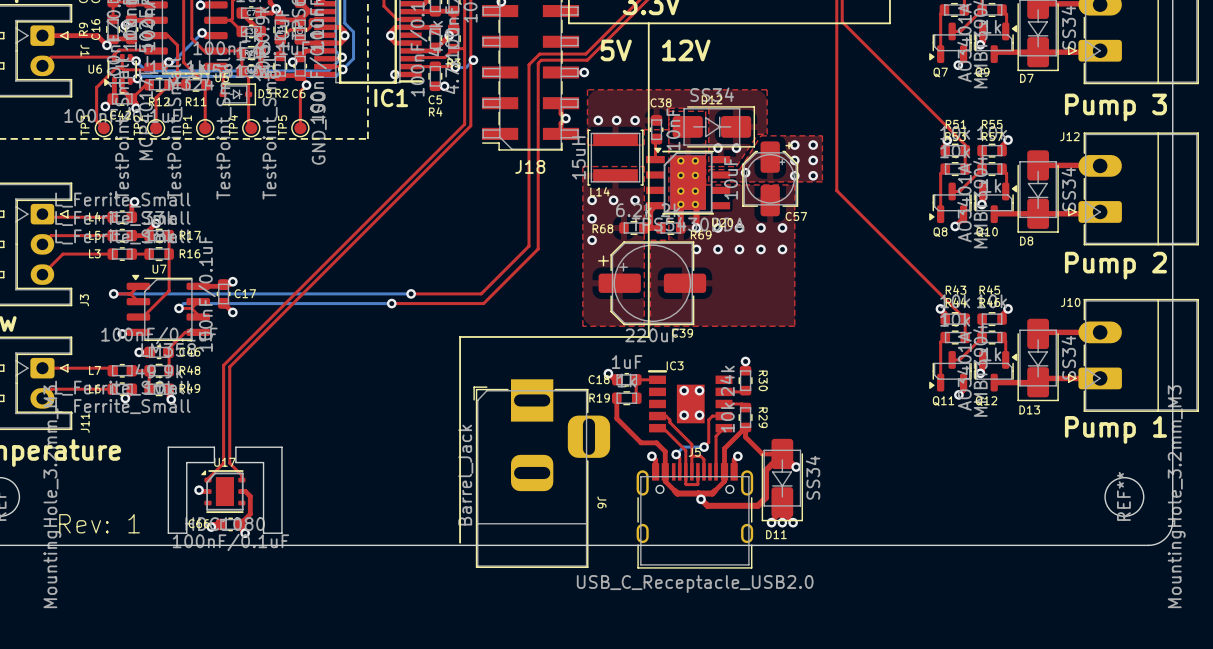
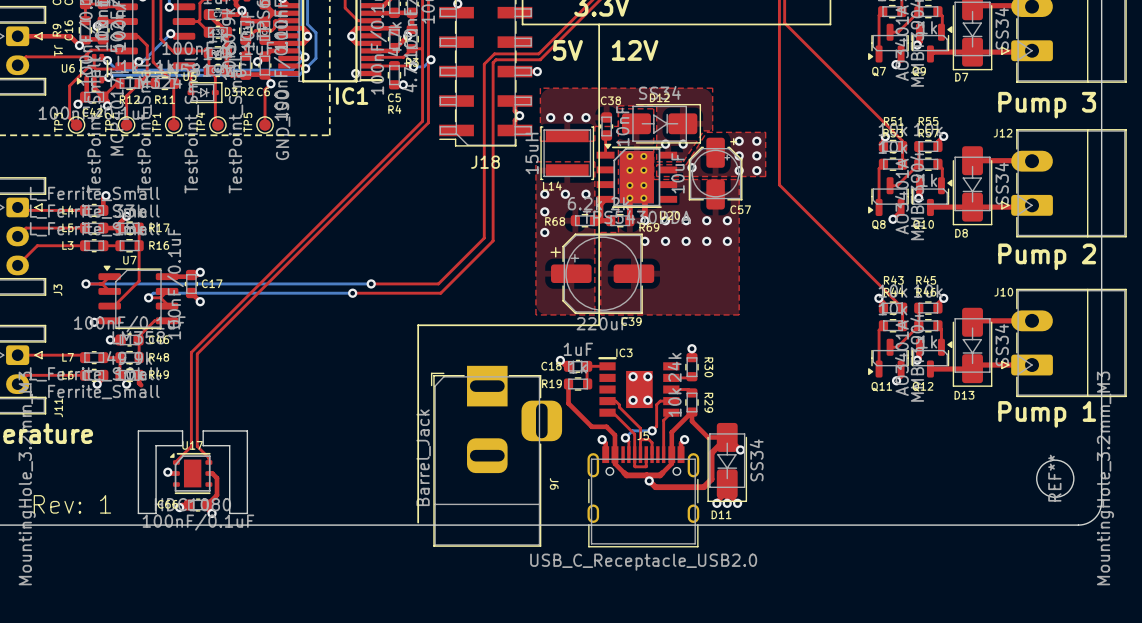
via position: (171, 399) -> (126, 384)

